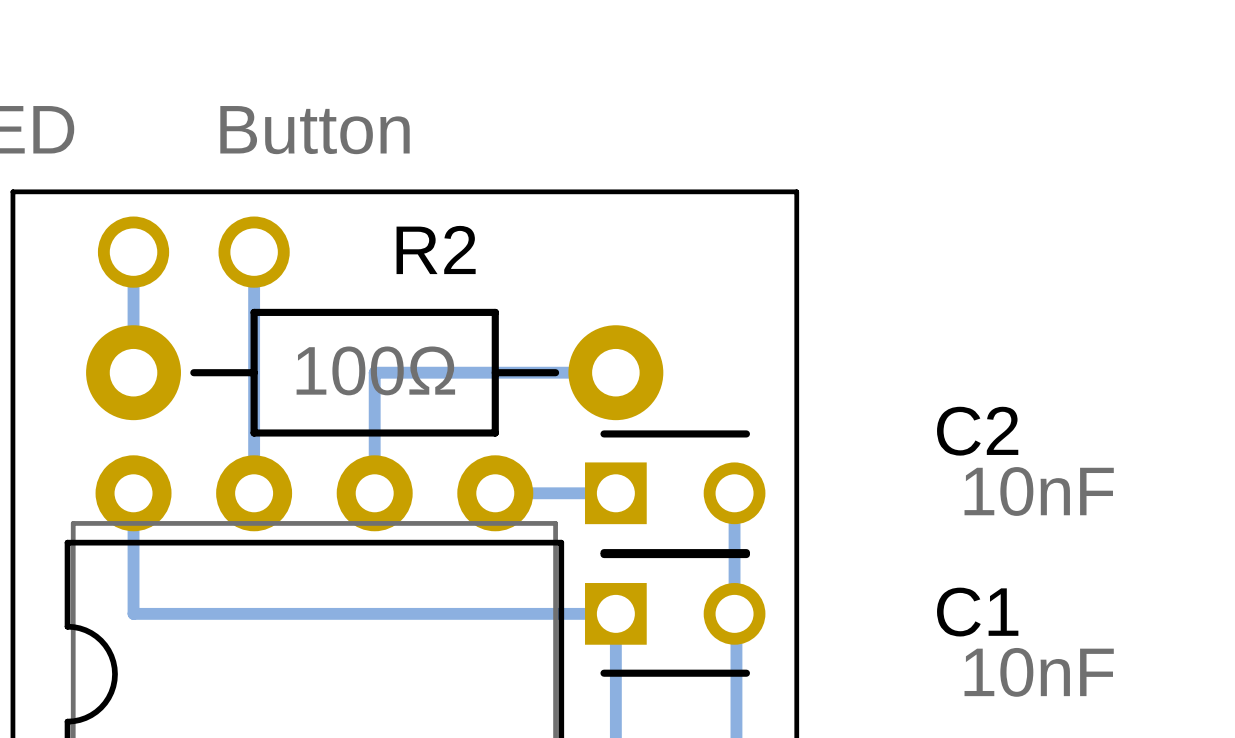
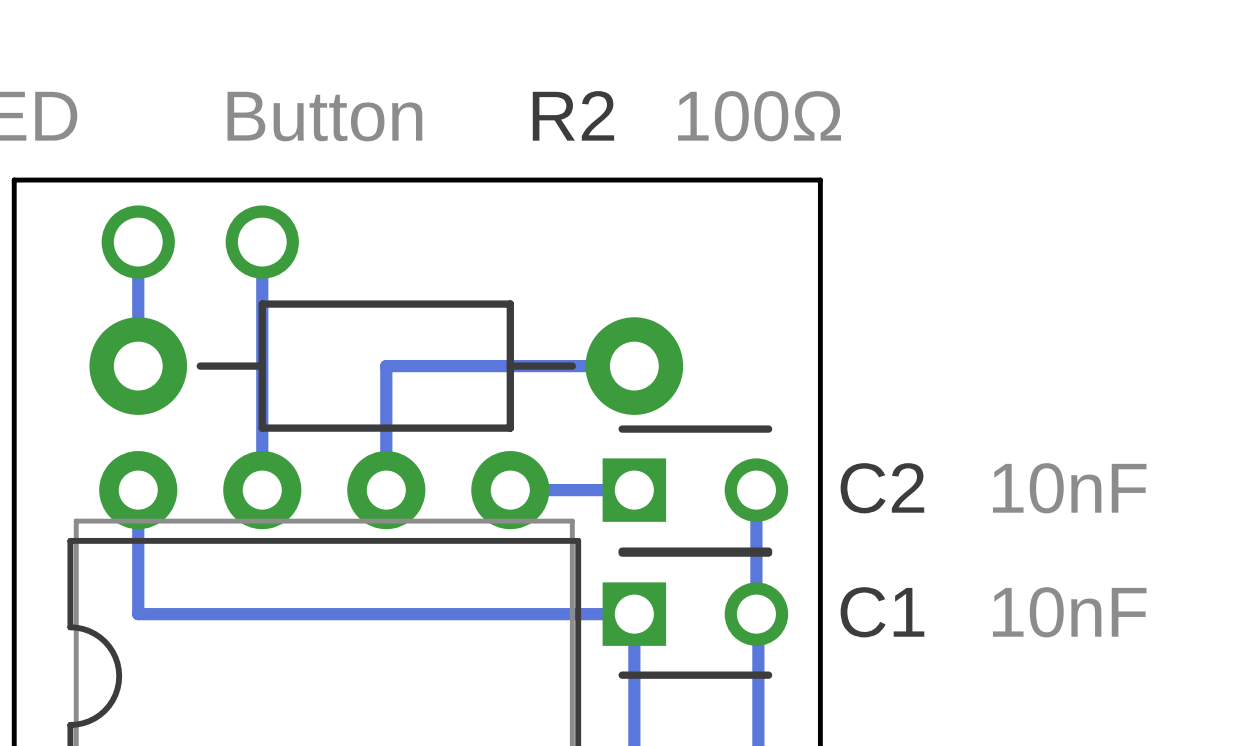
R2 name position: R2 (436, 249) -> R2 (573, 115)
R2 value position: 100Ω (375, 370) -> 100Ω (759, 116)
C2 name position: C2 (977, 431) -> C2 (882, 488)
C1 name position: C1 (977, 612) -> C1 (882, 612)
C1 value position: 10nF (1039, 672) -> 10nF (1069, 612)

